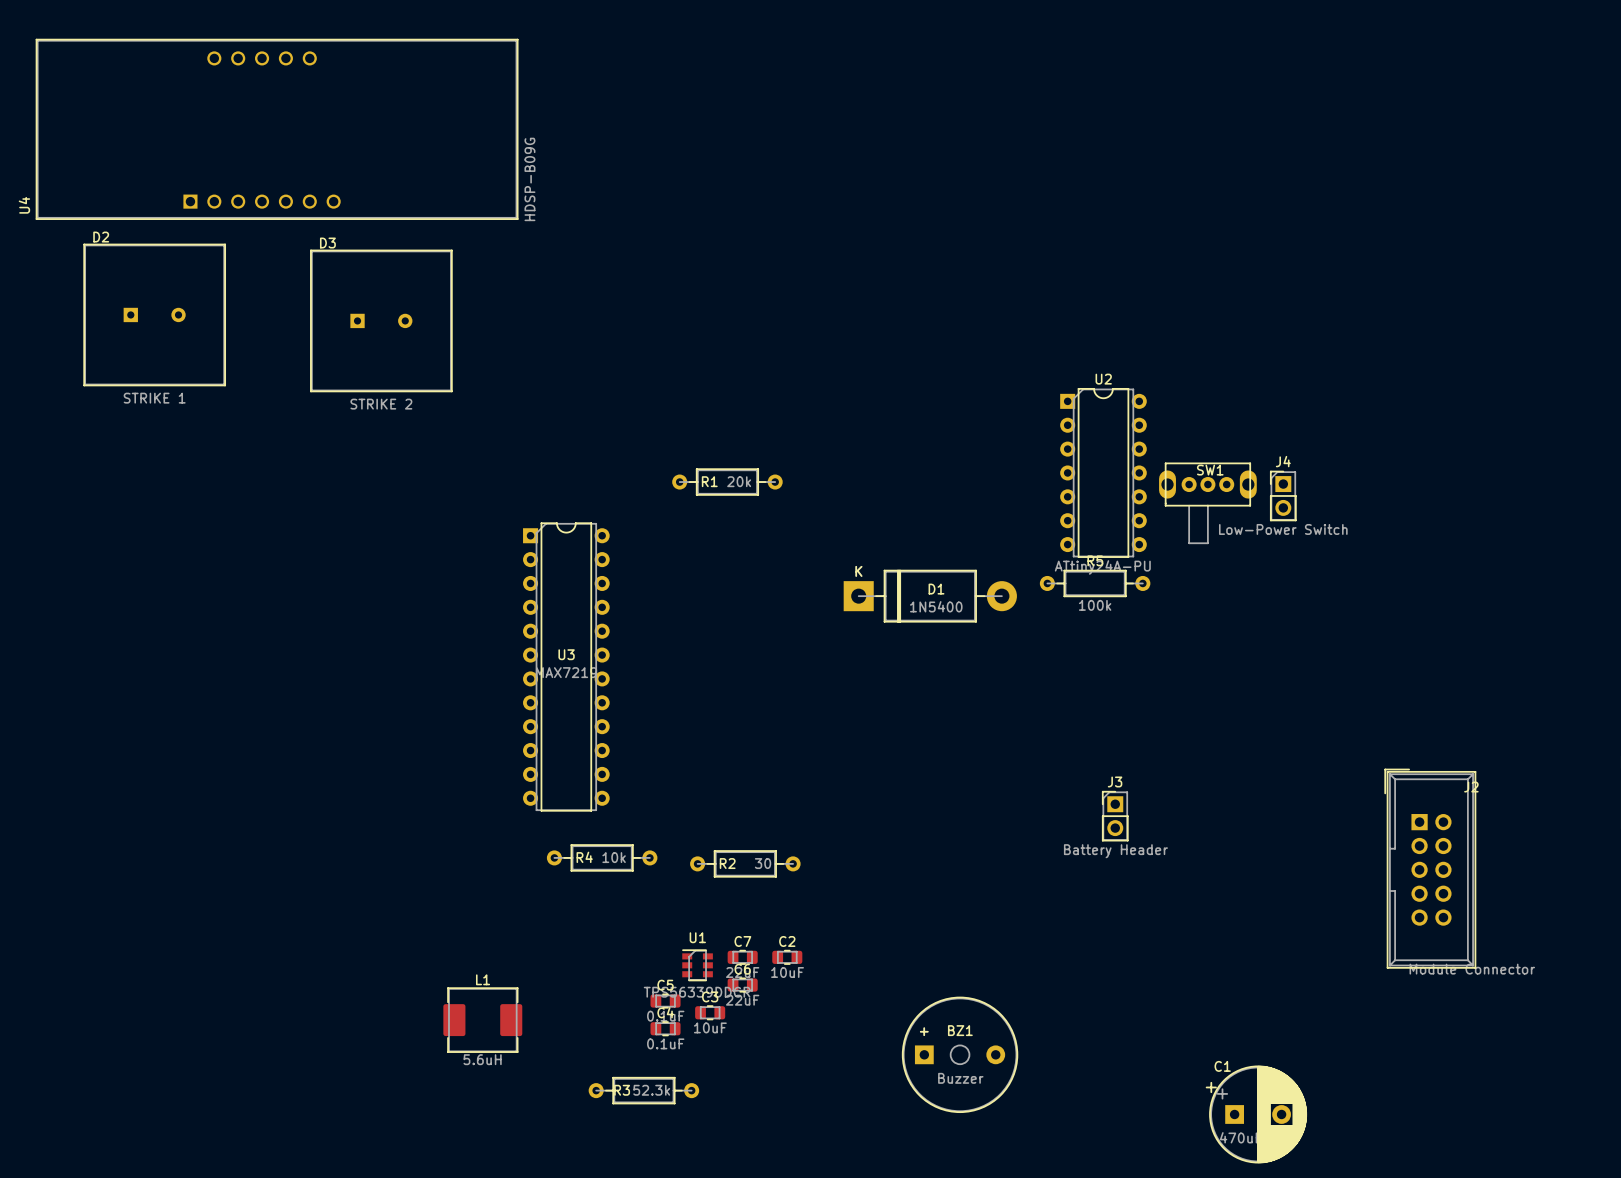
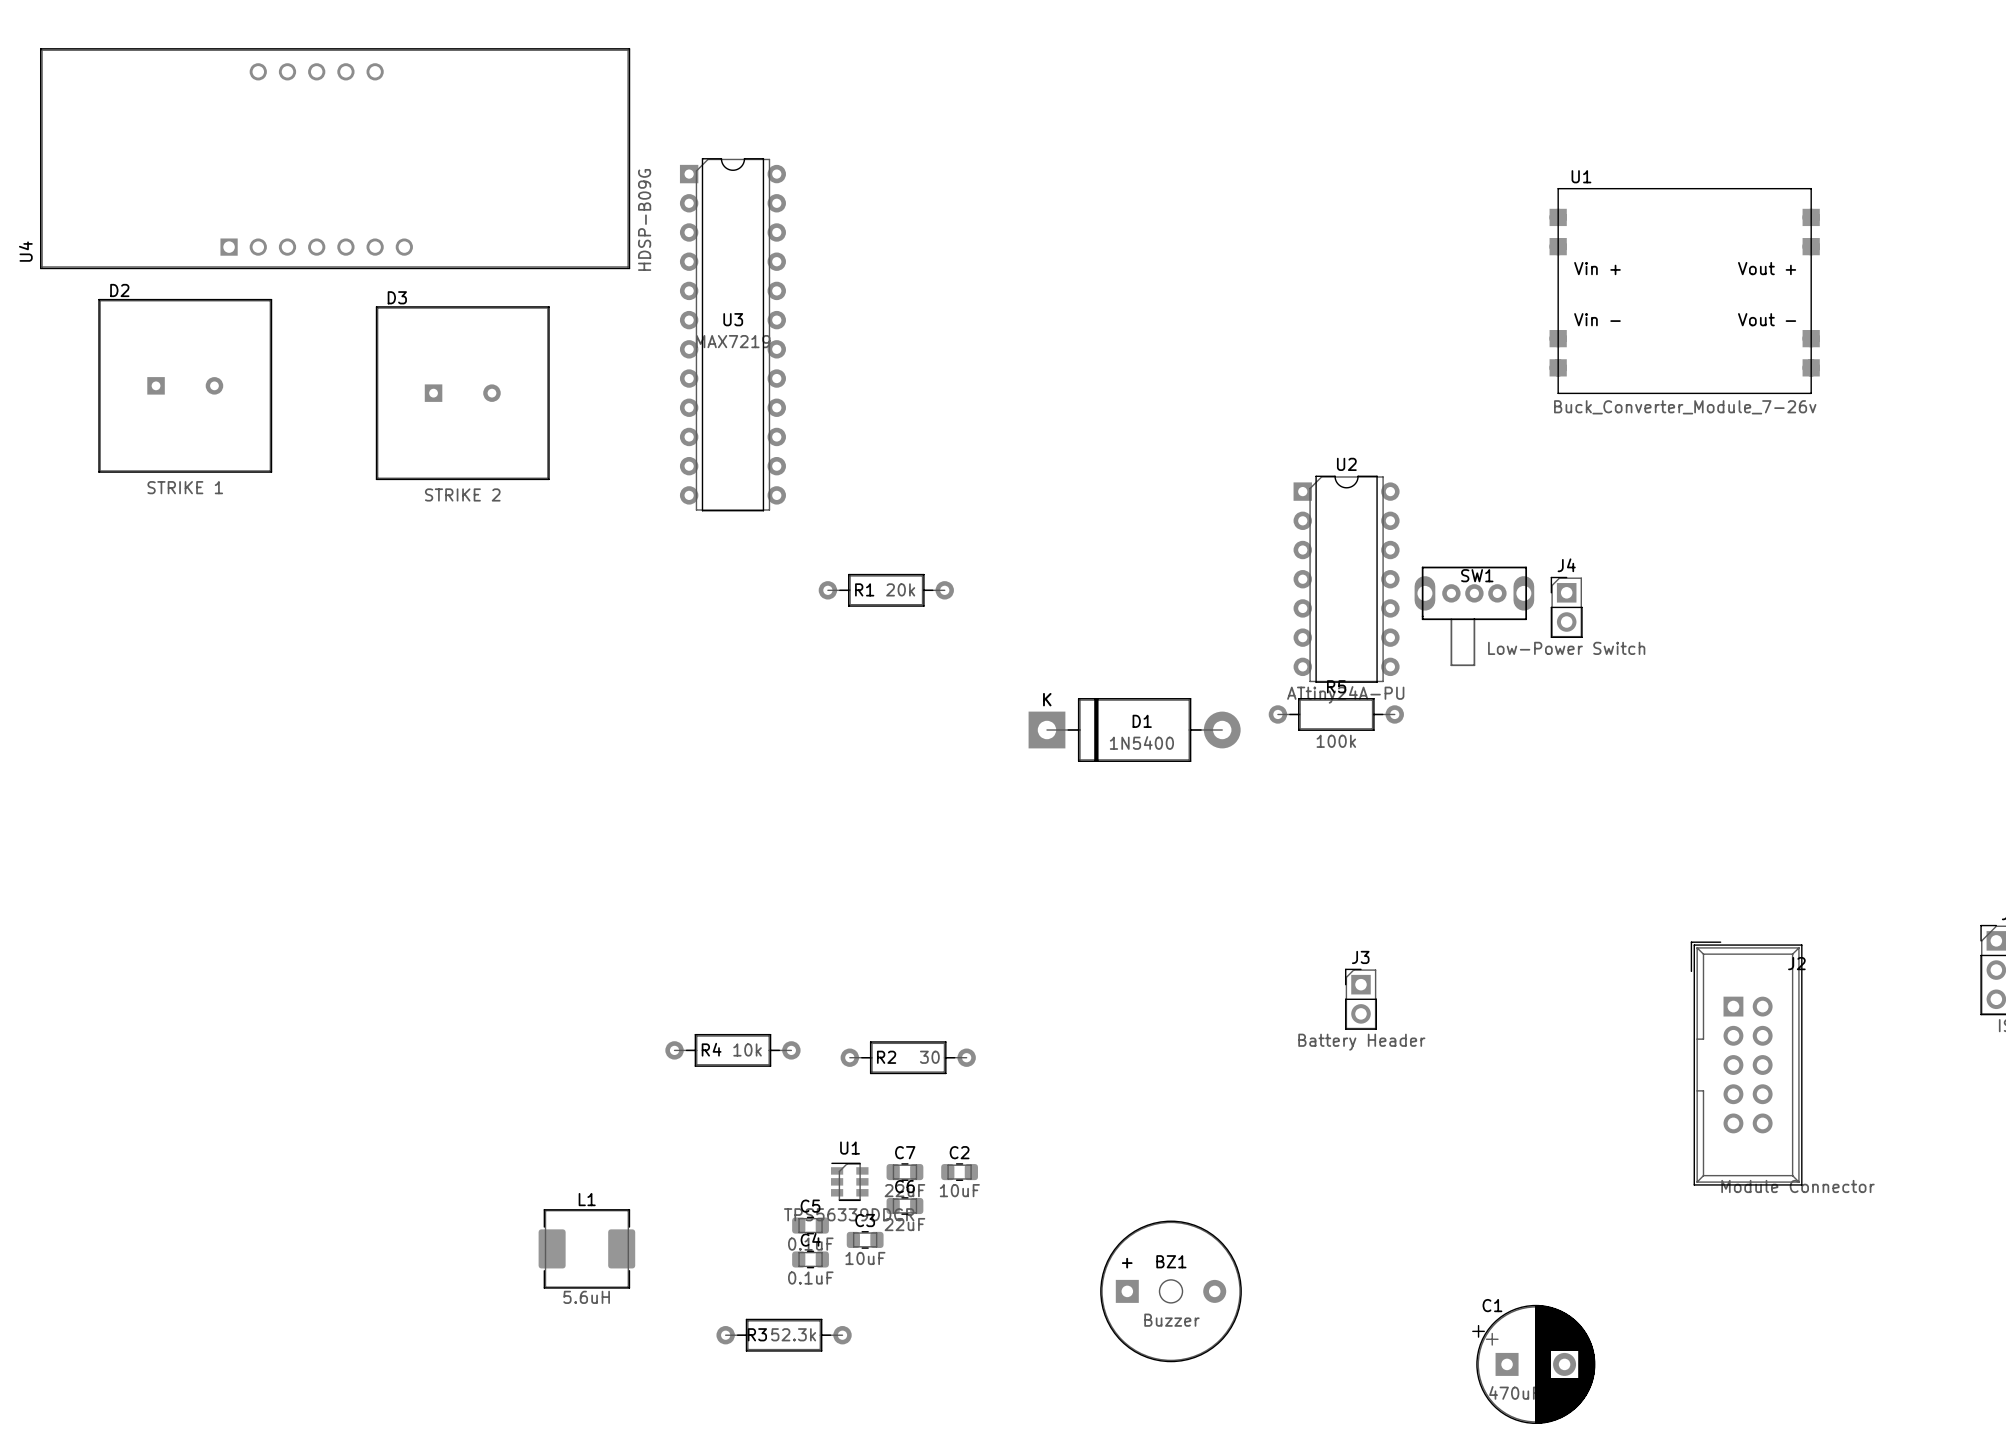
U1: none -> Buck_Converter_Module_7-26v (1684, 291)
U3 position: (566, 667) -> (732, 334)

